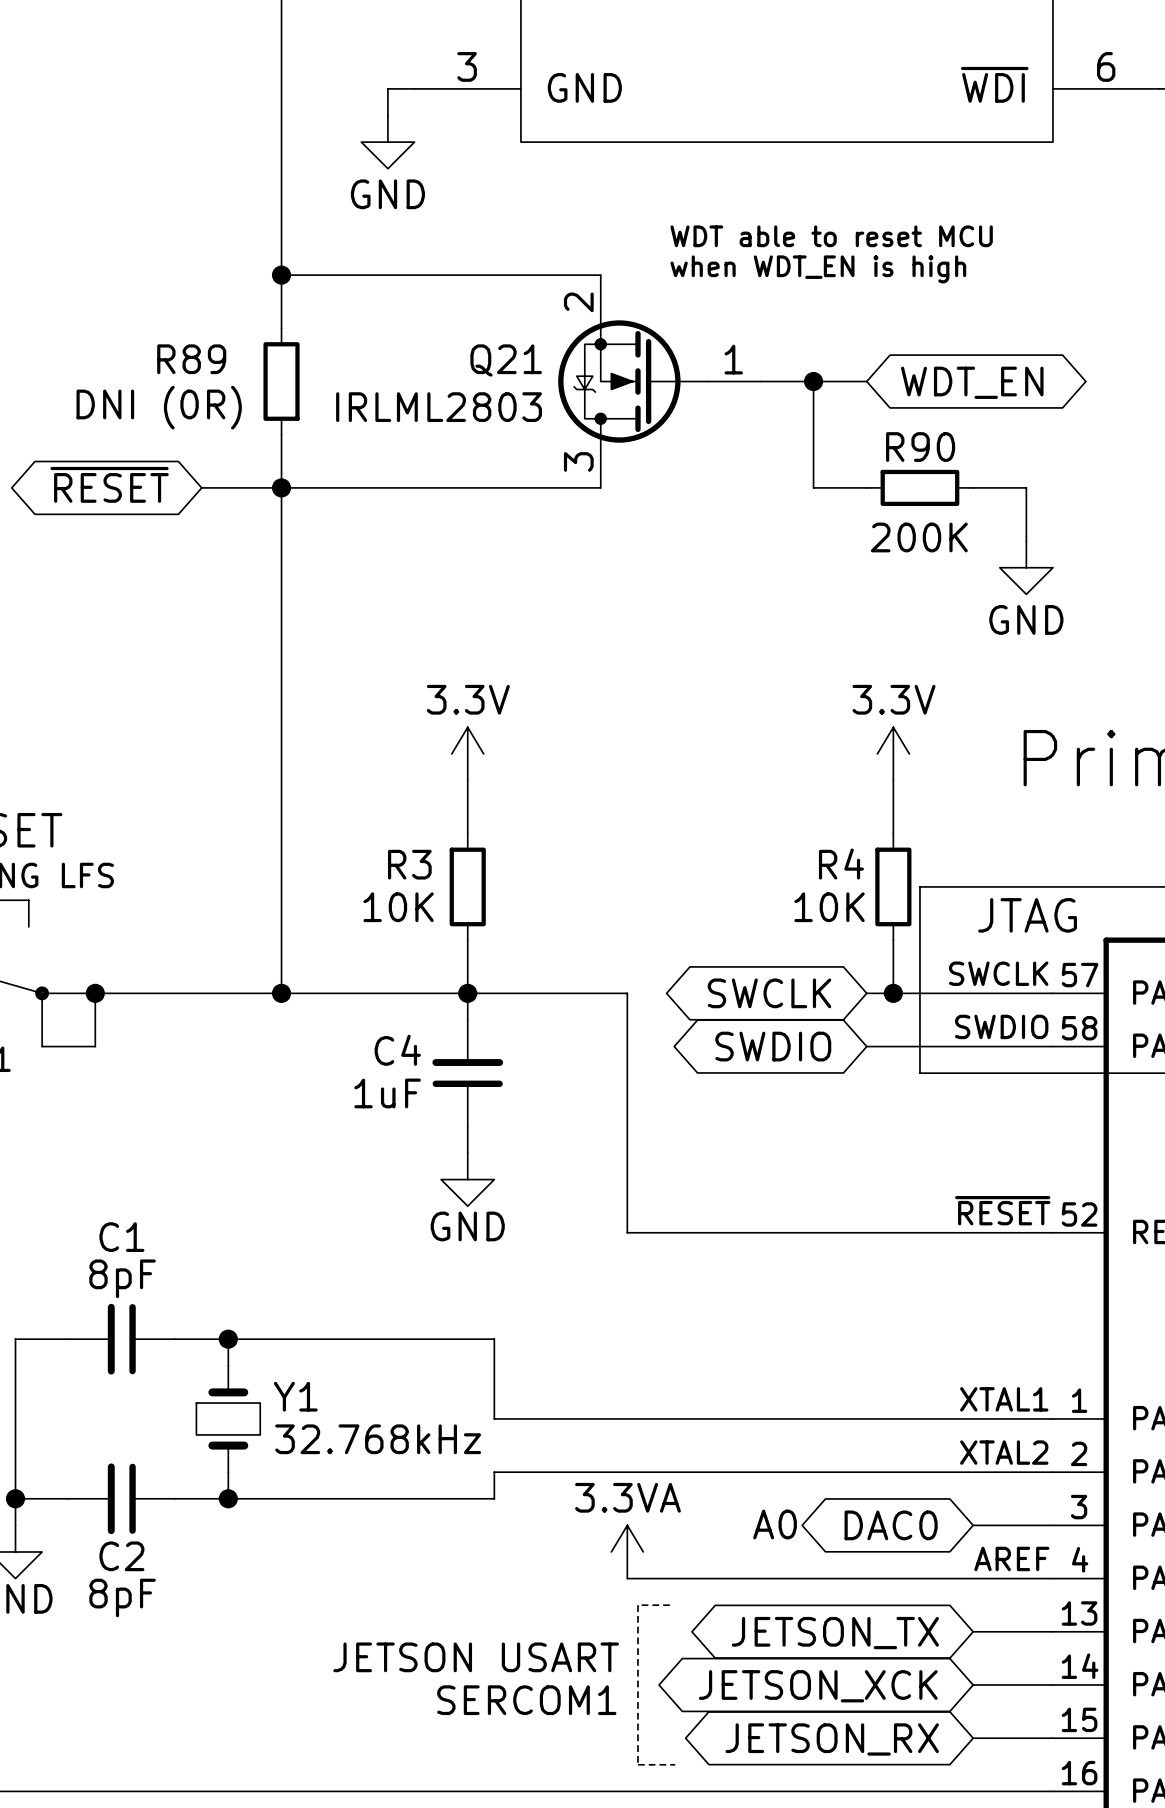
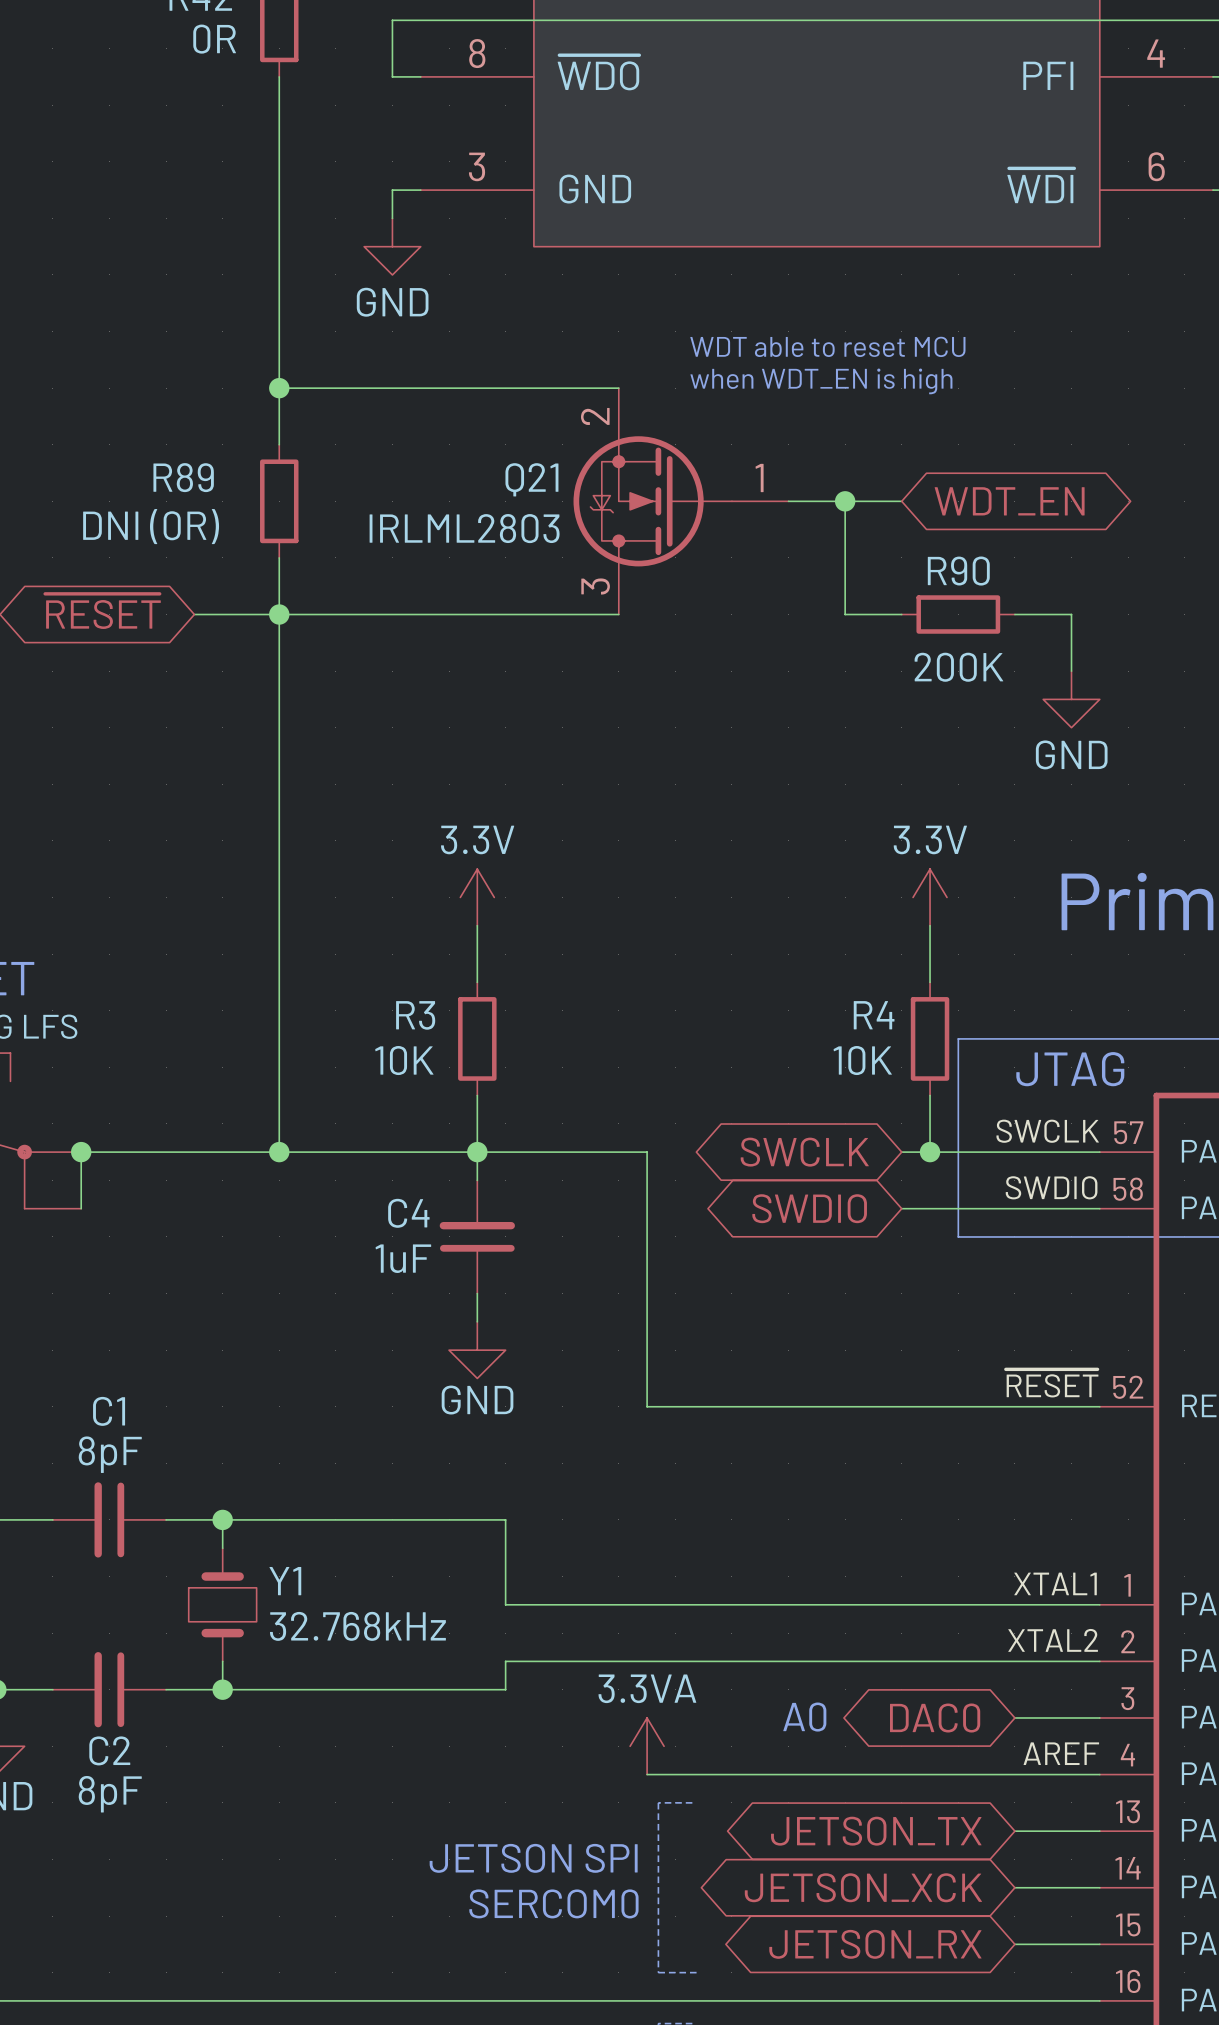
text: JETSON USART (476, 1657) -> JETSON SPI (533, 1858)
text: SERCOM1 (526, 1700) -> SERCOM0 (553, 1903)

